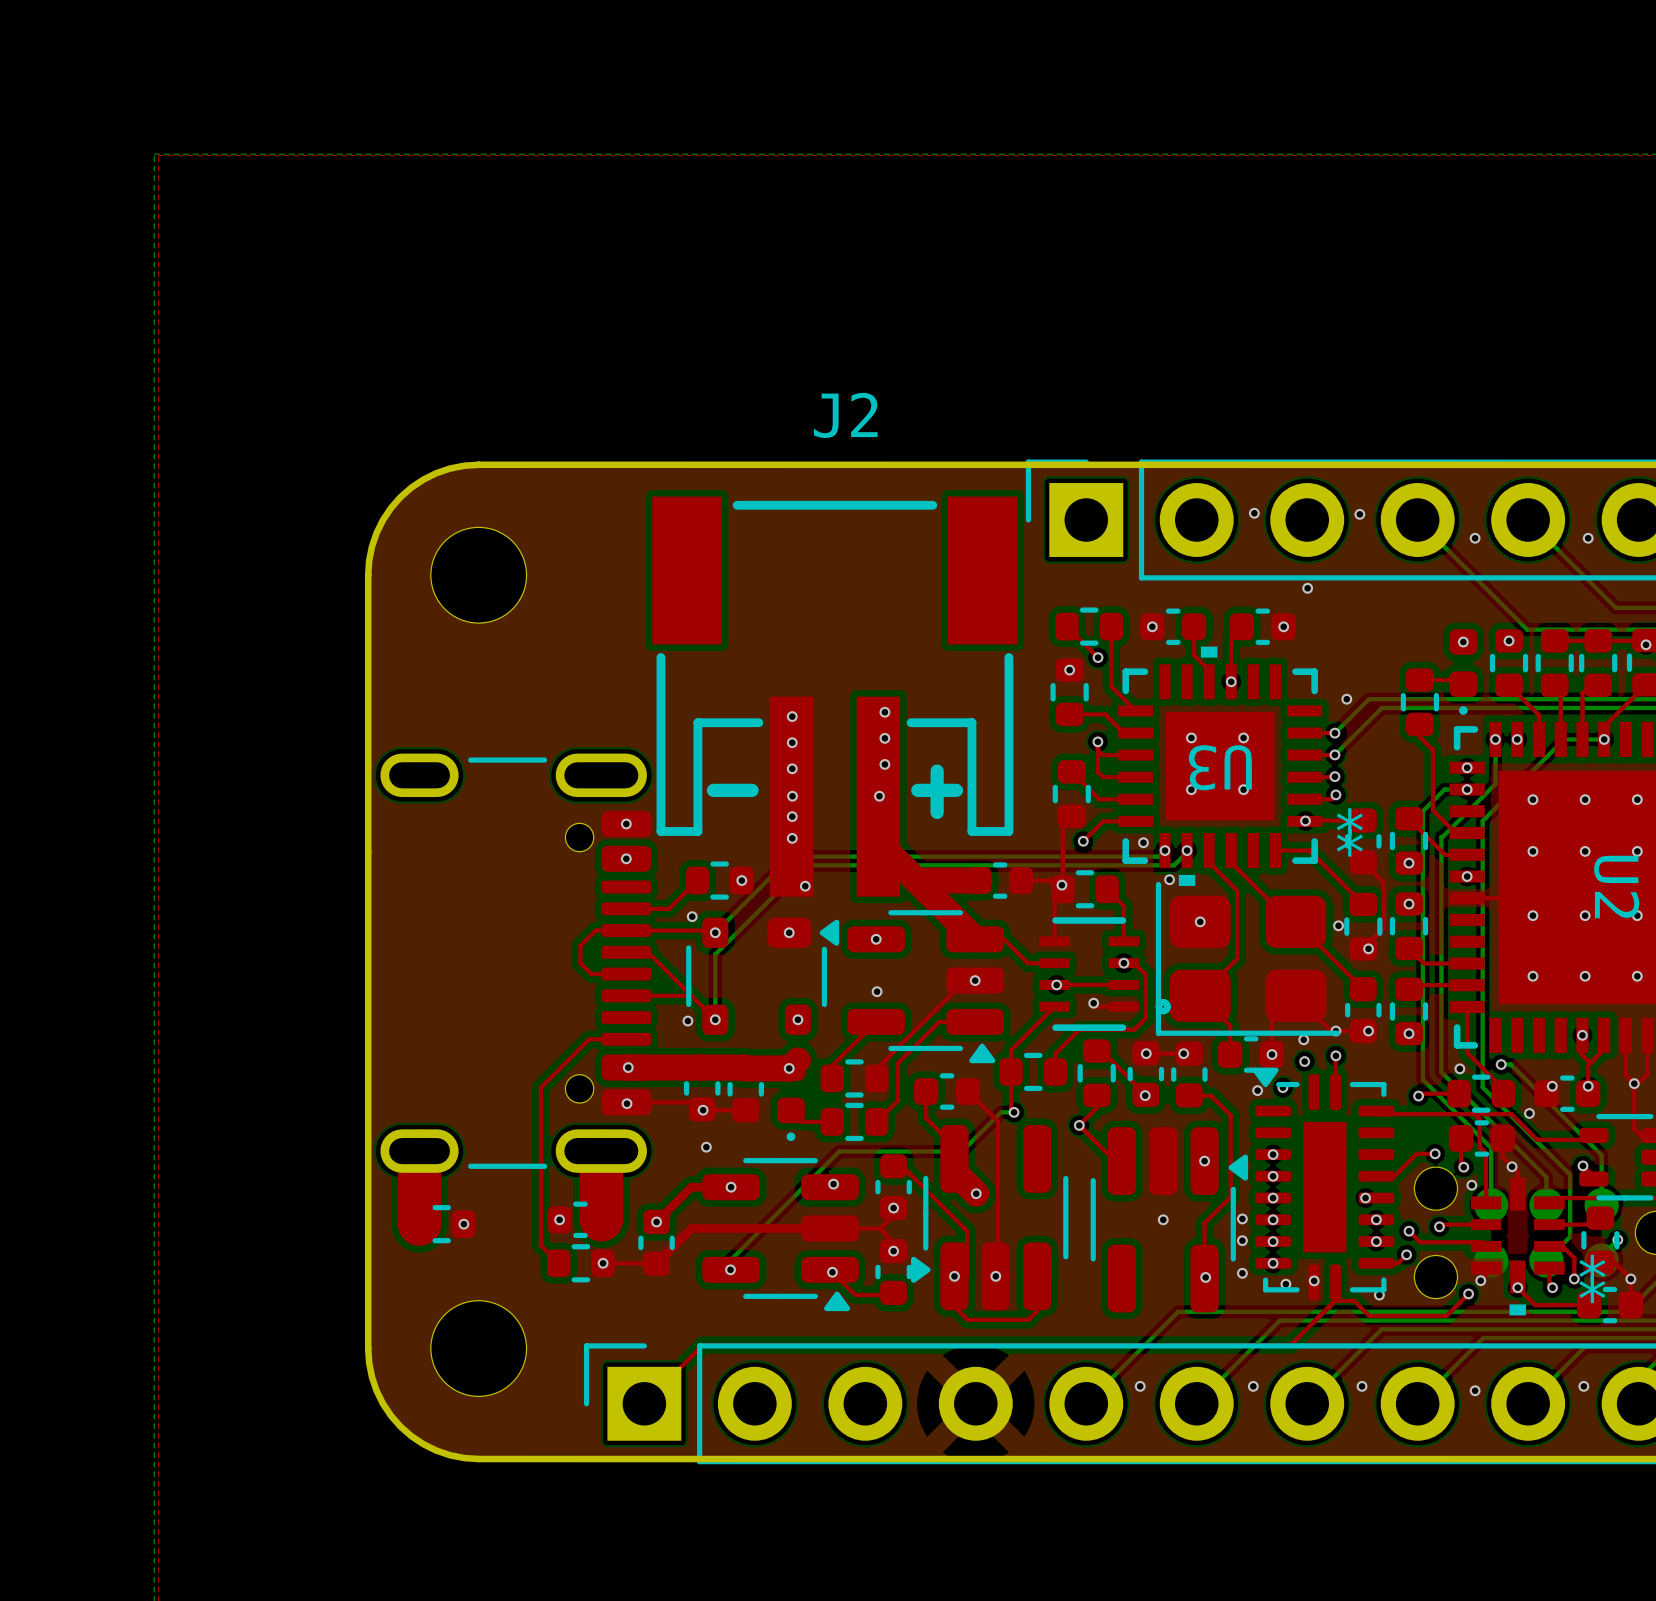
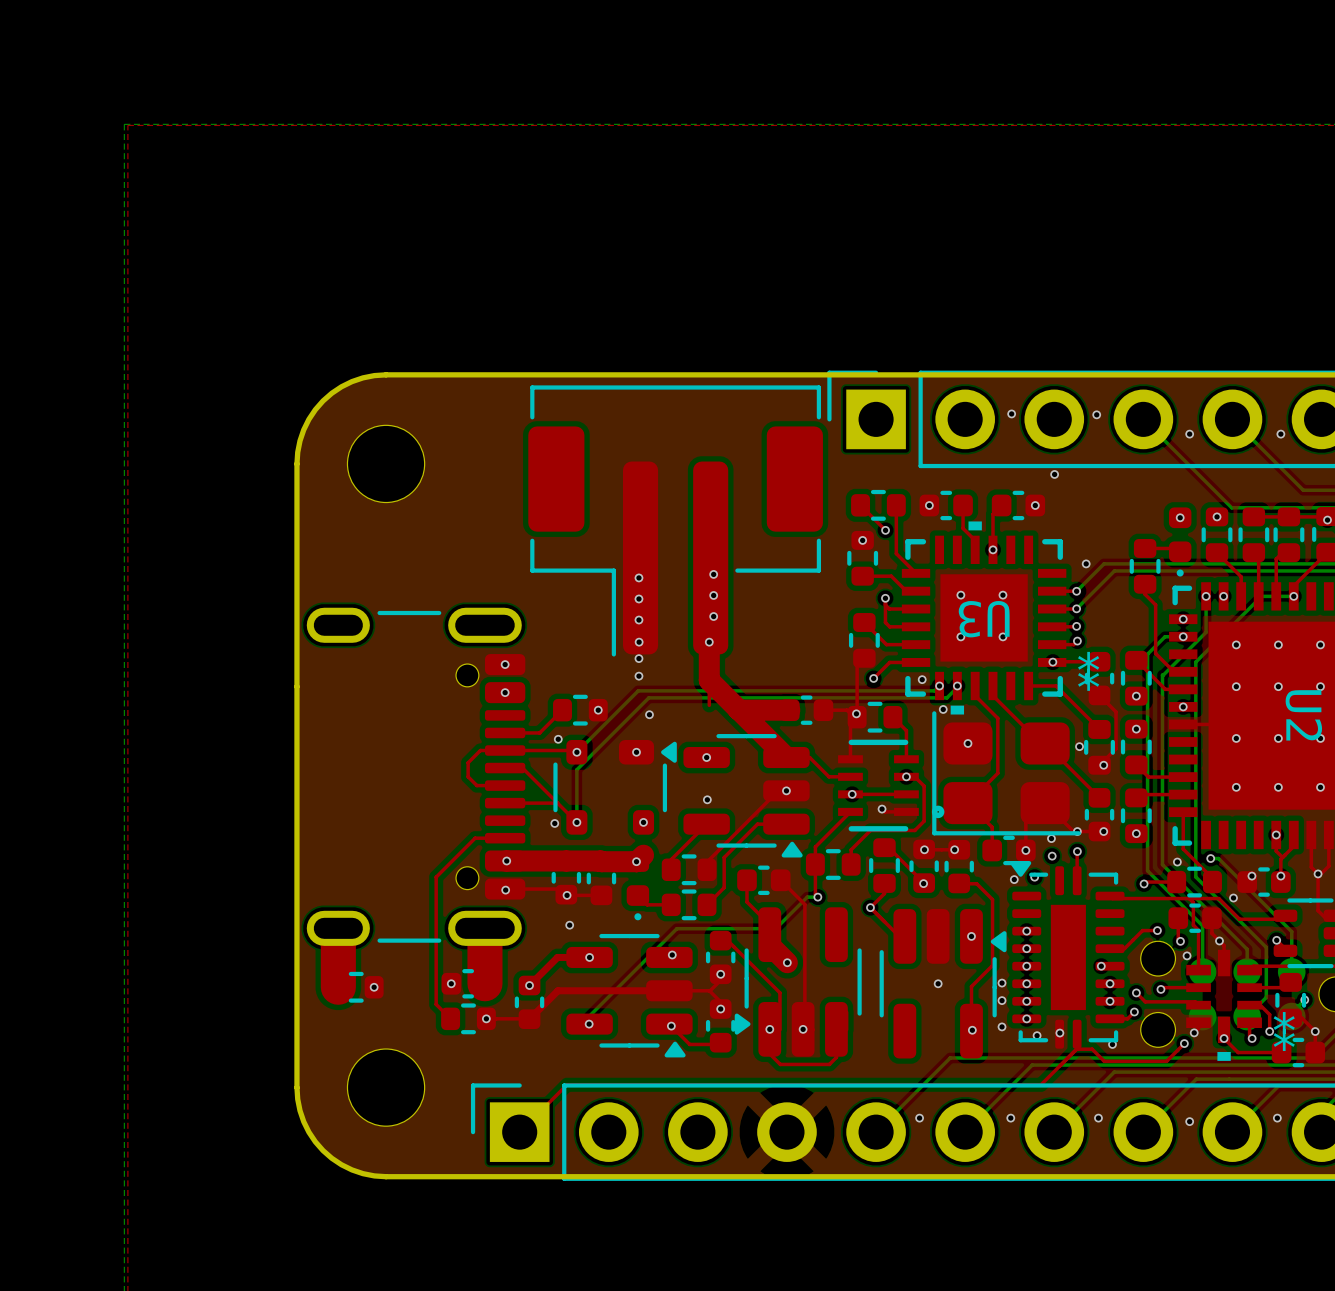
part: none -> (675, 520)
J2: (834, 696) -> none

